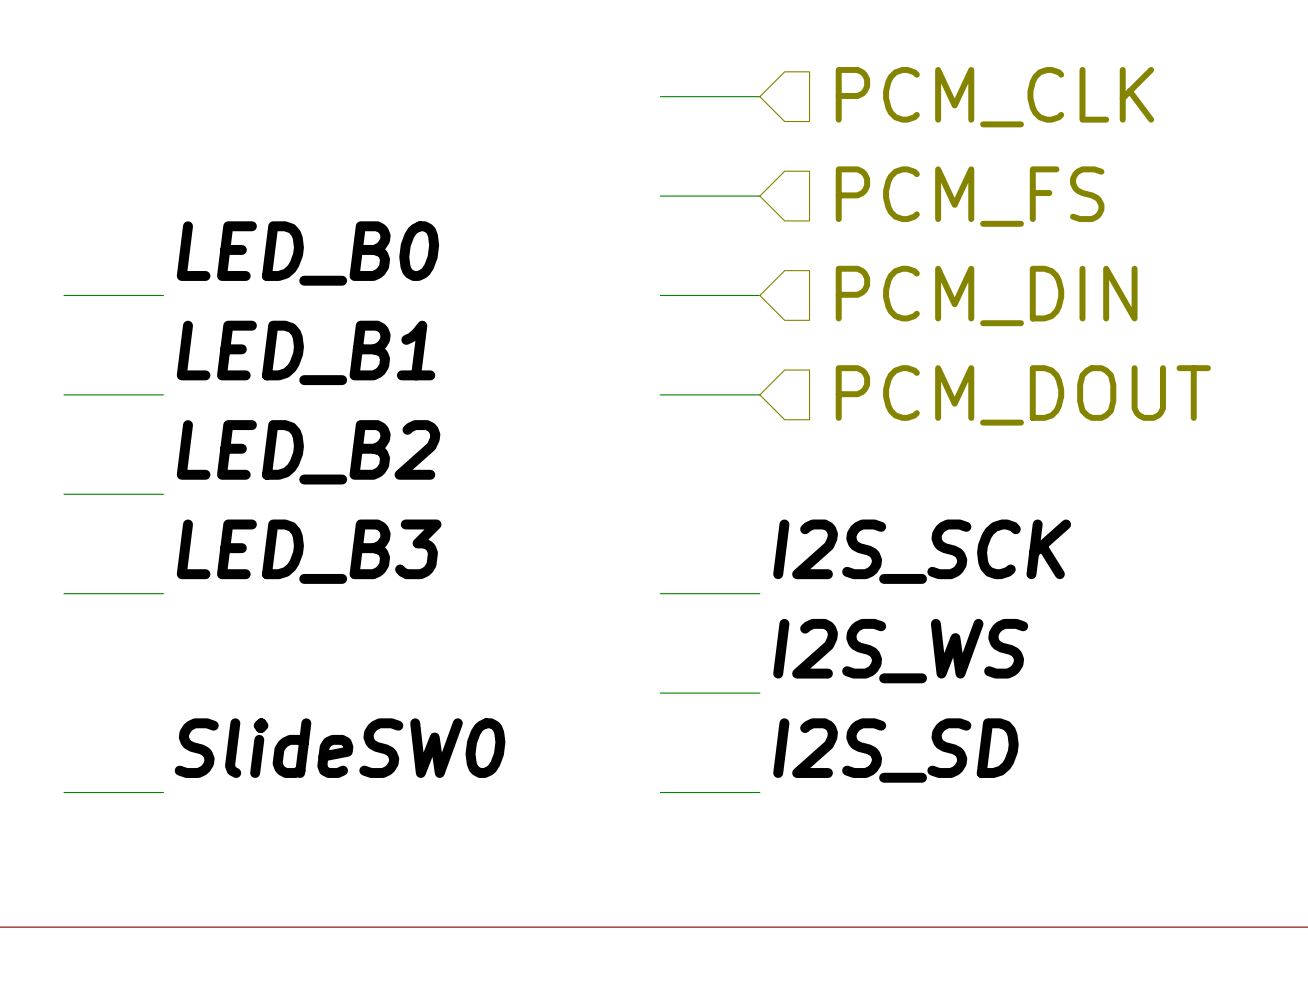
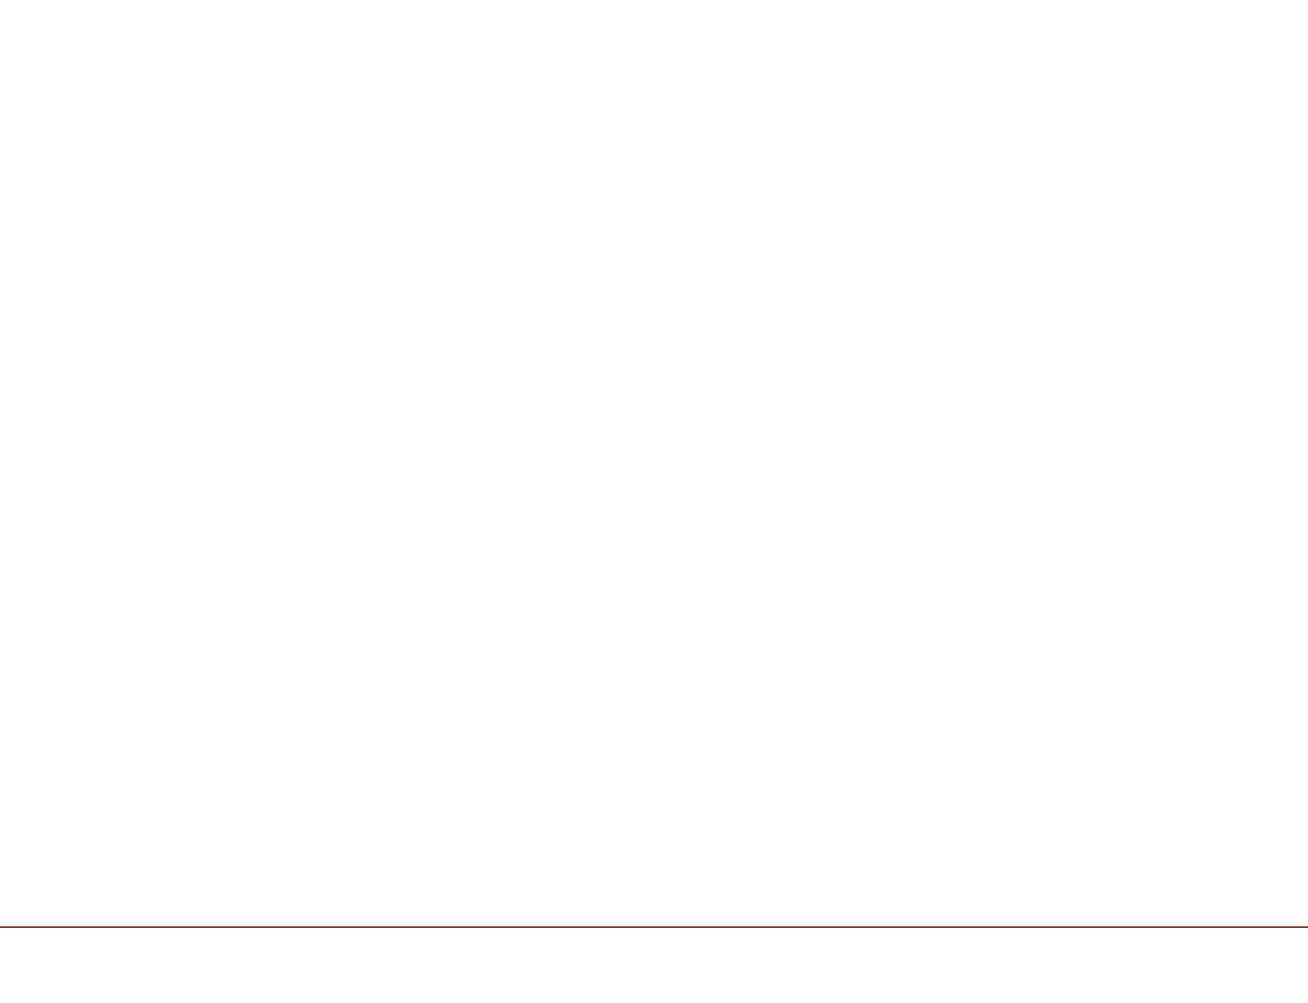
wire: (660, 96) (759, 96) -> none
hierarchical label: PCM_CLK (994, 97) -> none
wire: (660, 196) (759, 196) -> none
hierarchical label: PCM_FS (970, 196) -> none
label: LED_B0 (307, 253) -> none
wire: (64, 295) (163, 295) -> none
wire: (660, 295) (759, 295) -> none
hierarchical label: PCM_DIN (986, 295) -> none
label: LED_B1 (306, 352) -> none
wire: (64, 394) (163, 394) -> none
wire: (660, 394) (759, 394) -> none
hierarchical label: PCM_DOUT (1023, 395) -> none
label: LED_B2 (308, 452) -> none
wire: (64, 494) (163, 494) -> none
label: LED_B3 (309, 551) -> none
label: I2S_SCK (922, 551) -> none
wire: (64, 593) (163, 593) -> none
wire: (660, 593) (759, 593) -> none
label: I2S_WS (900, 651) -> none
wire: (660, 693) (759, 693) -> none
label: SlideSW0 (340, 748) -> none
label: I2S_SD (895, 750) -> none
wire: (64, 792) (163, 792) -> none
wire: (660, 792) (759, 792) -> none

